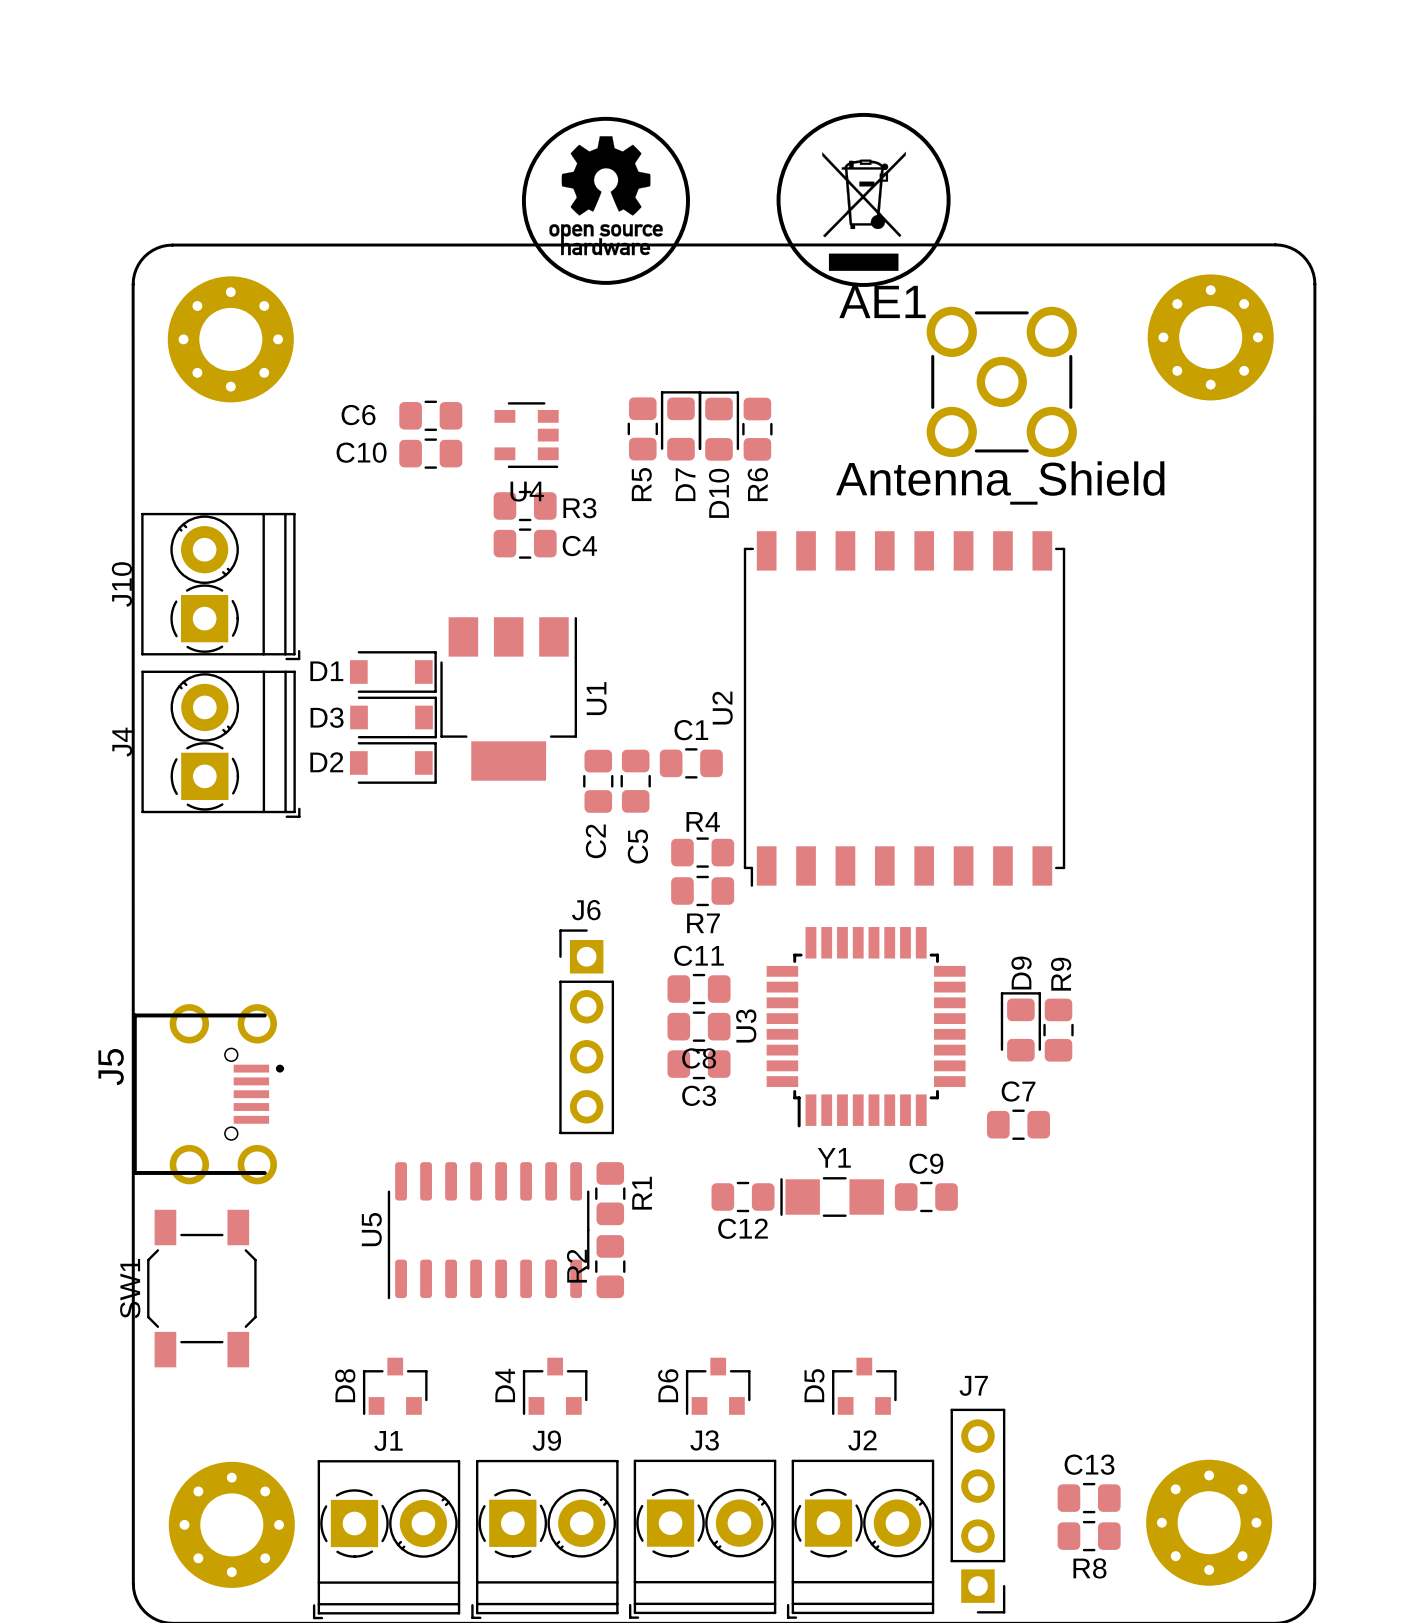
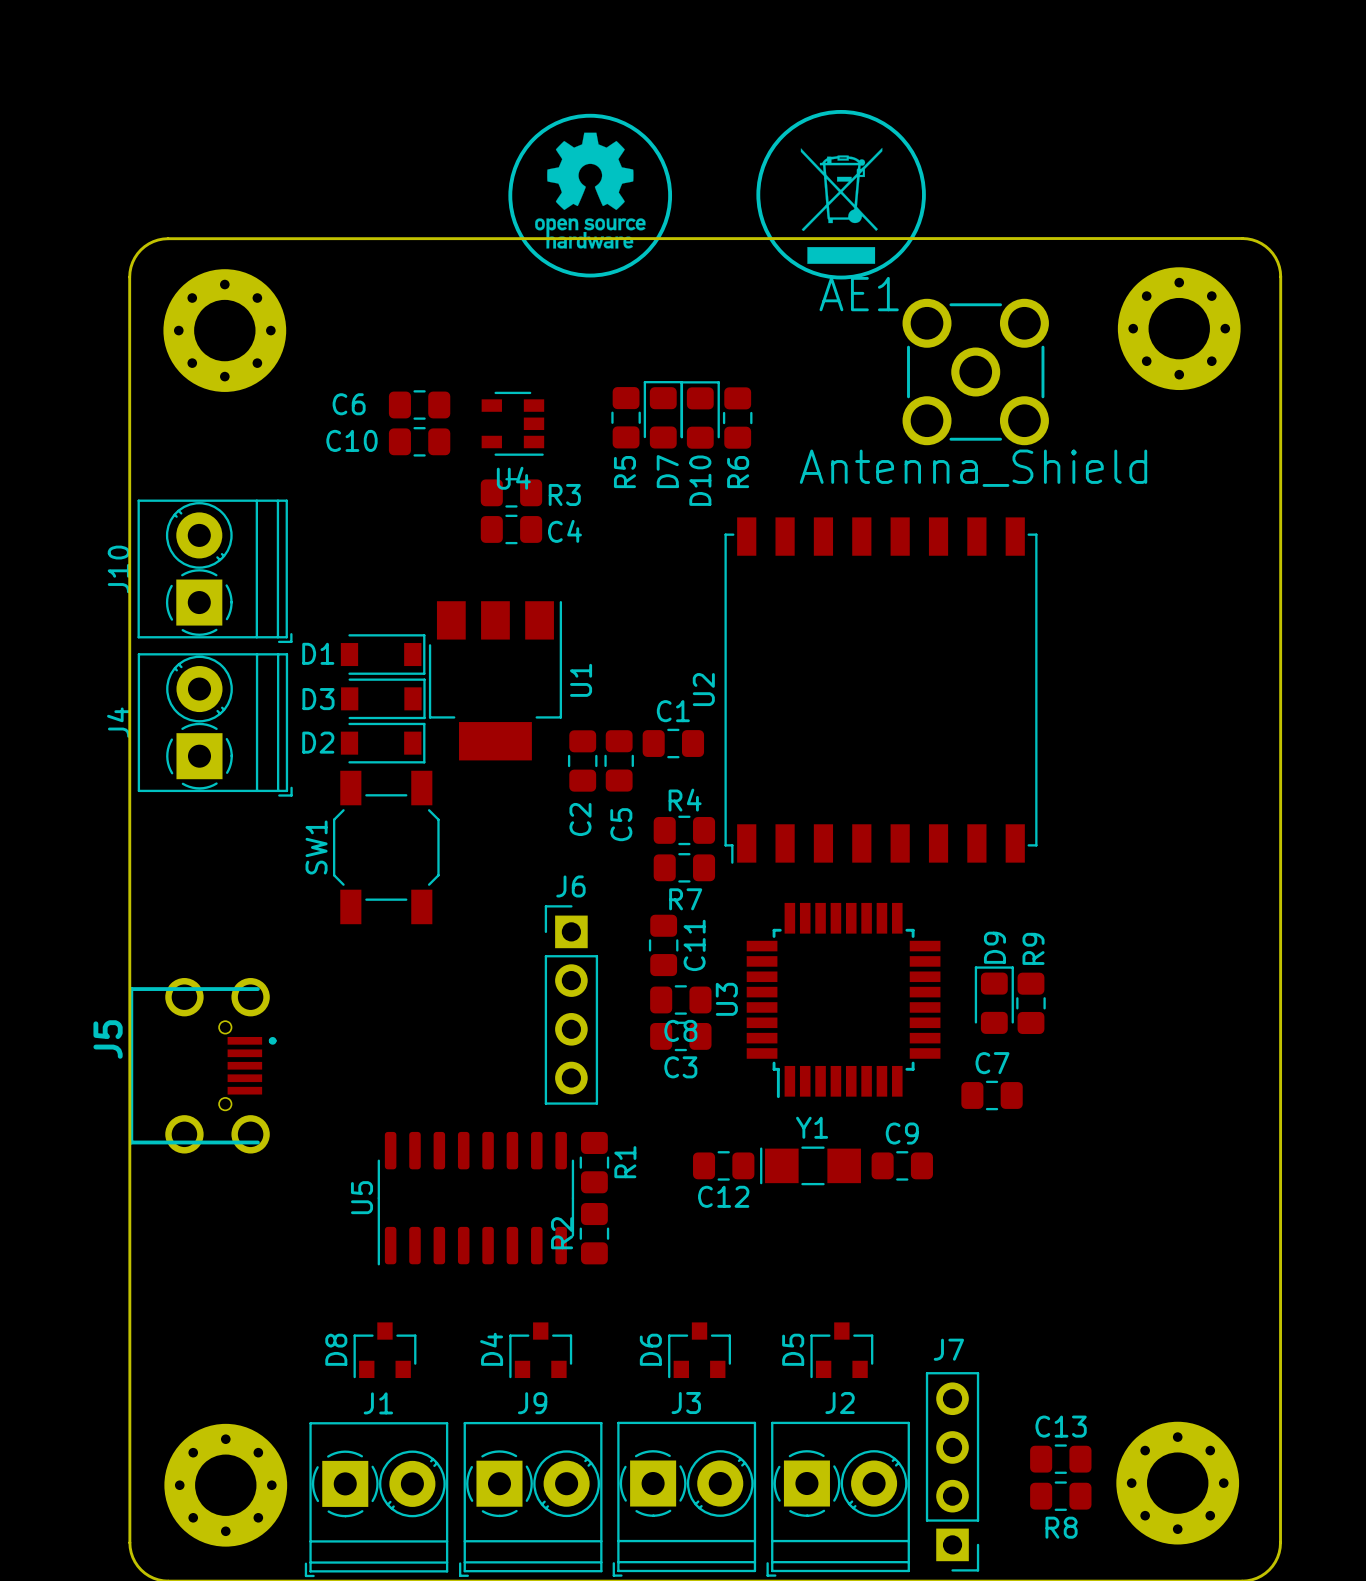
C11 rotation: 0° (699, 989) -> 90° clockwise (663, 945)
SW1 position: (201, 1288) -> (386, 847)

